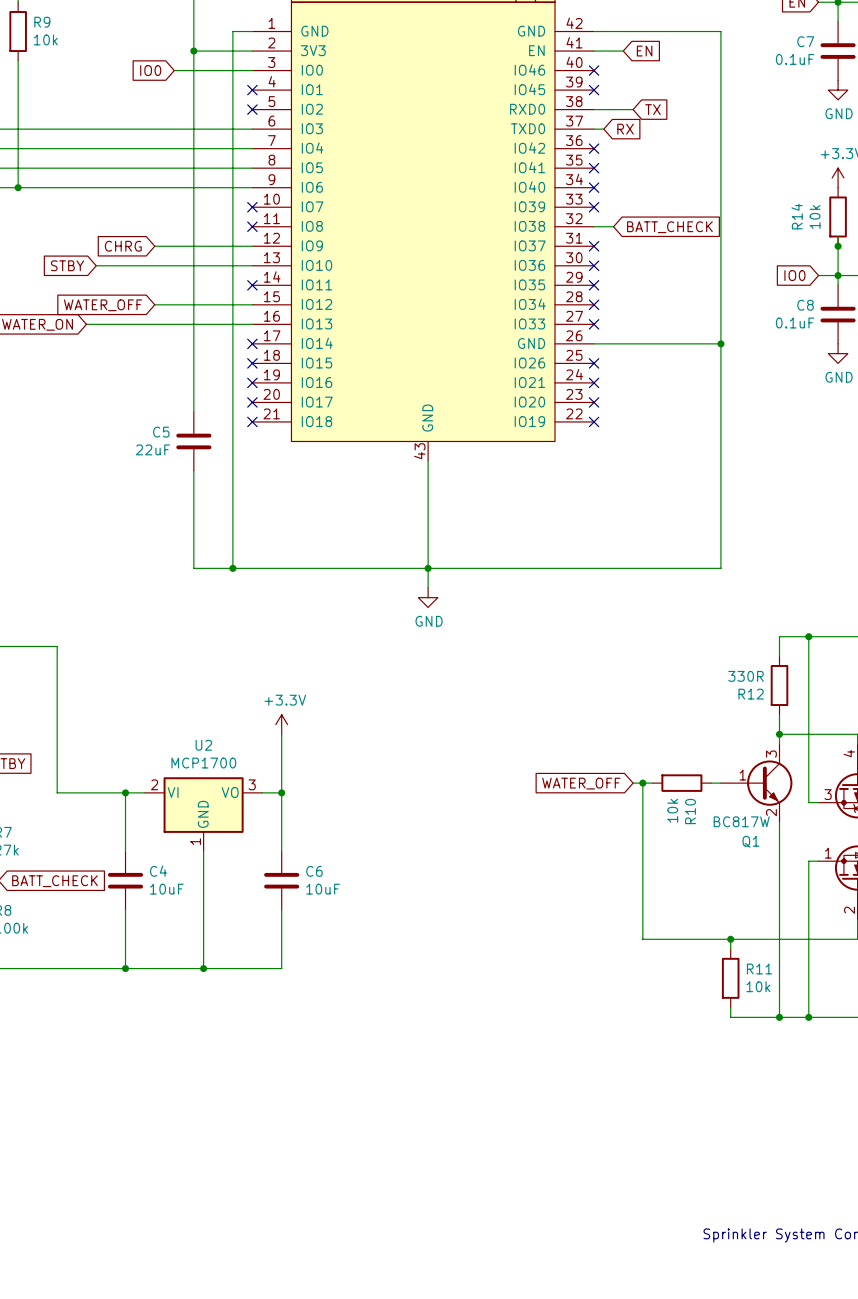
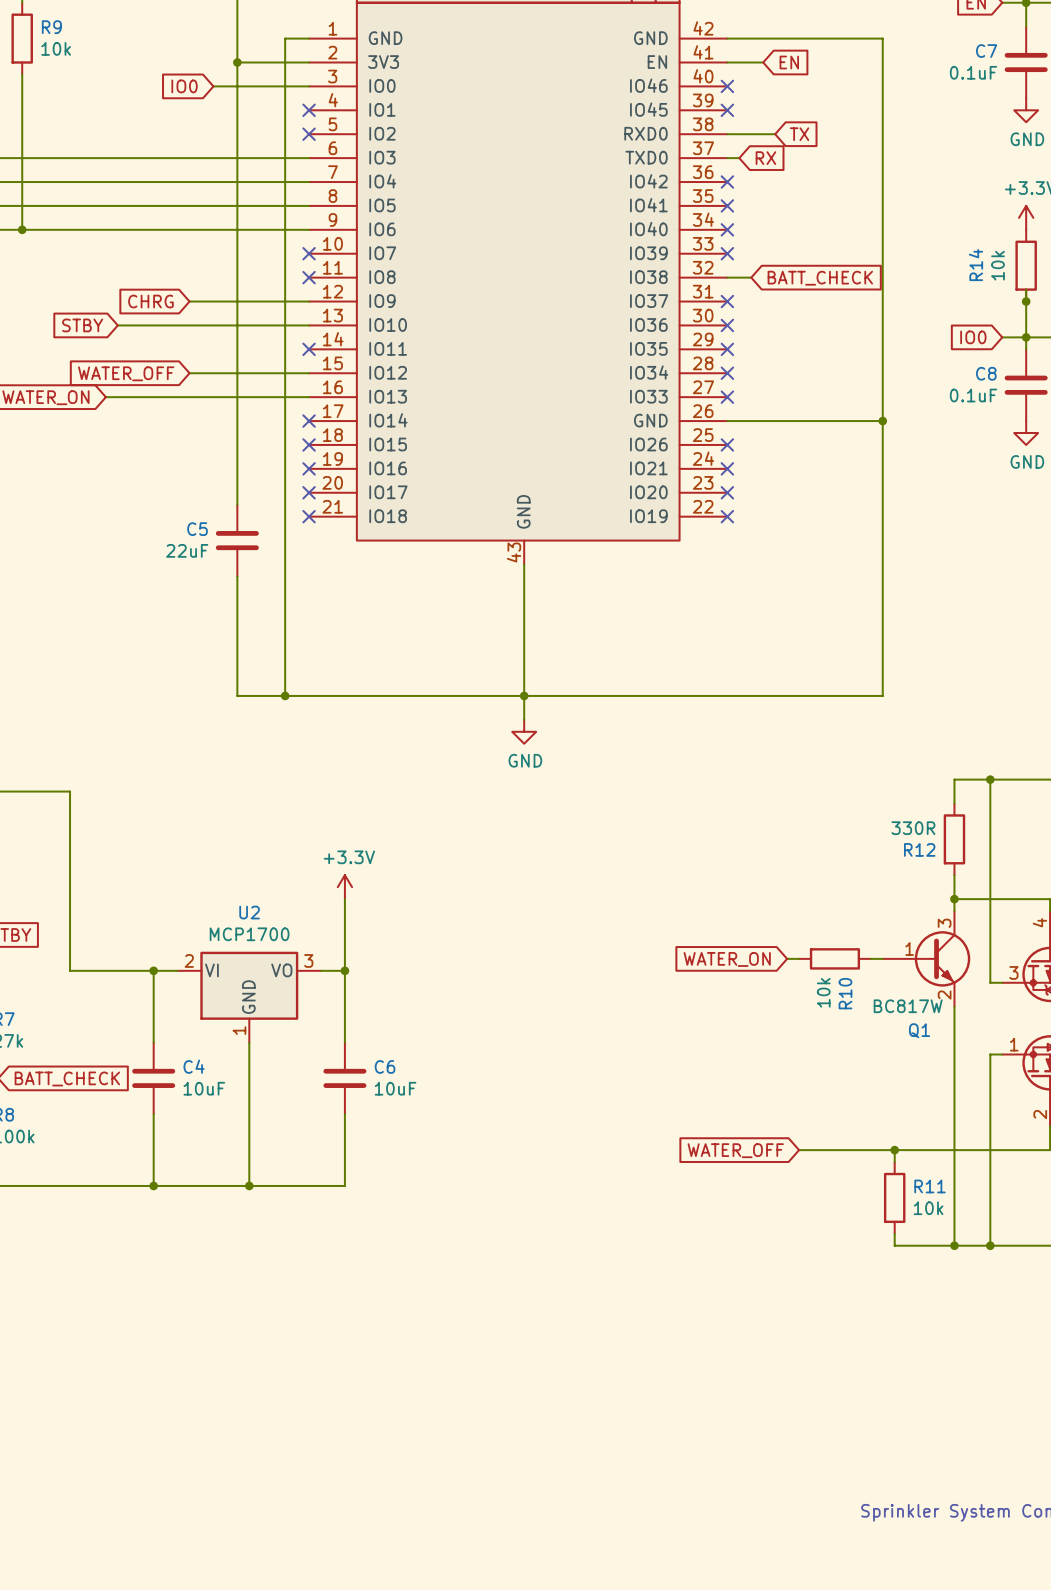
global label position: WATER_OFF (581, 783) -> WATER_OFF (735, 1150)
global label: none -> WATER_ON (727, 959)
wire: (633, 783) (642, 783) (642, 939) (652, 939) -> none
junction: (642, 783) -> none

